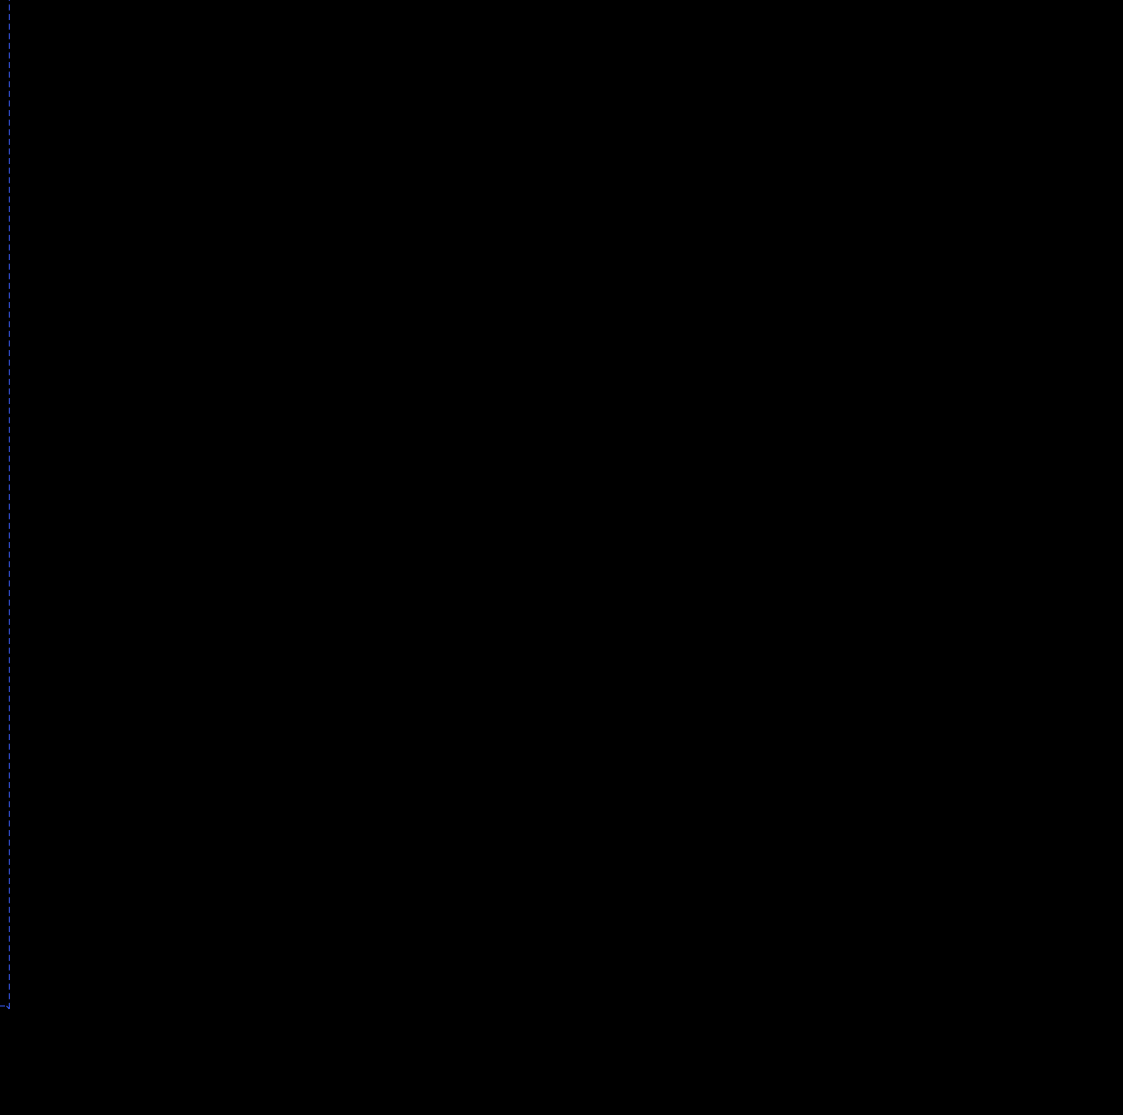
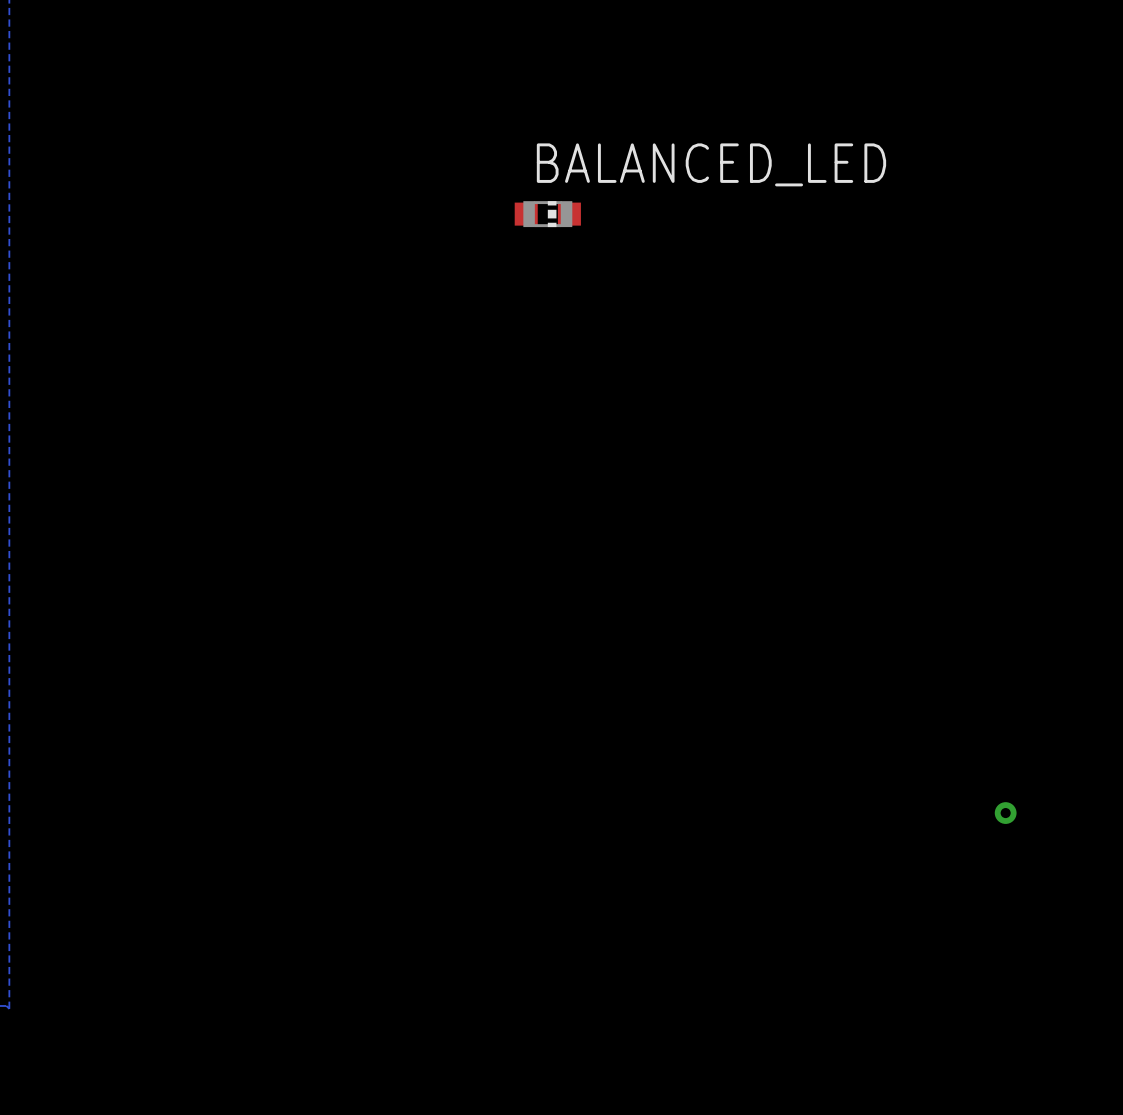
BALANCED_LED: none -> (547, 214)
via: none -> (1005, 813)

